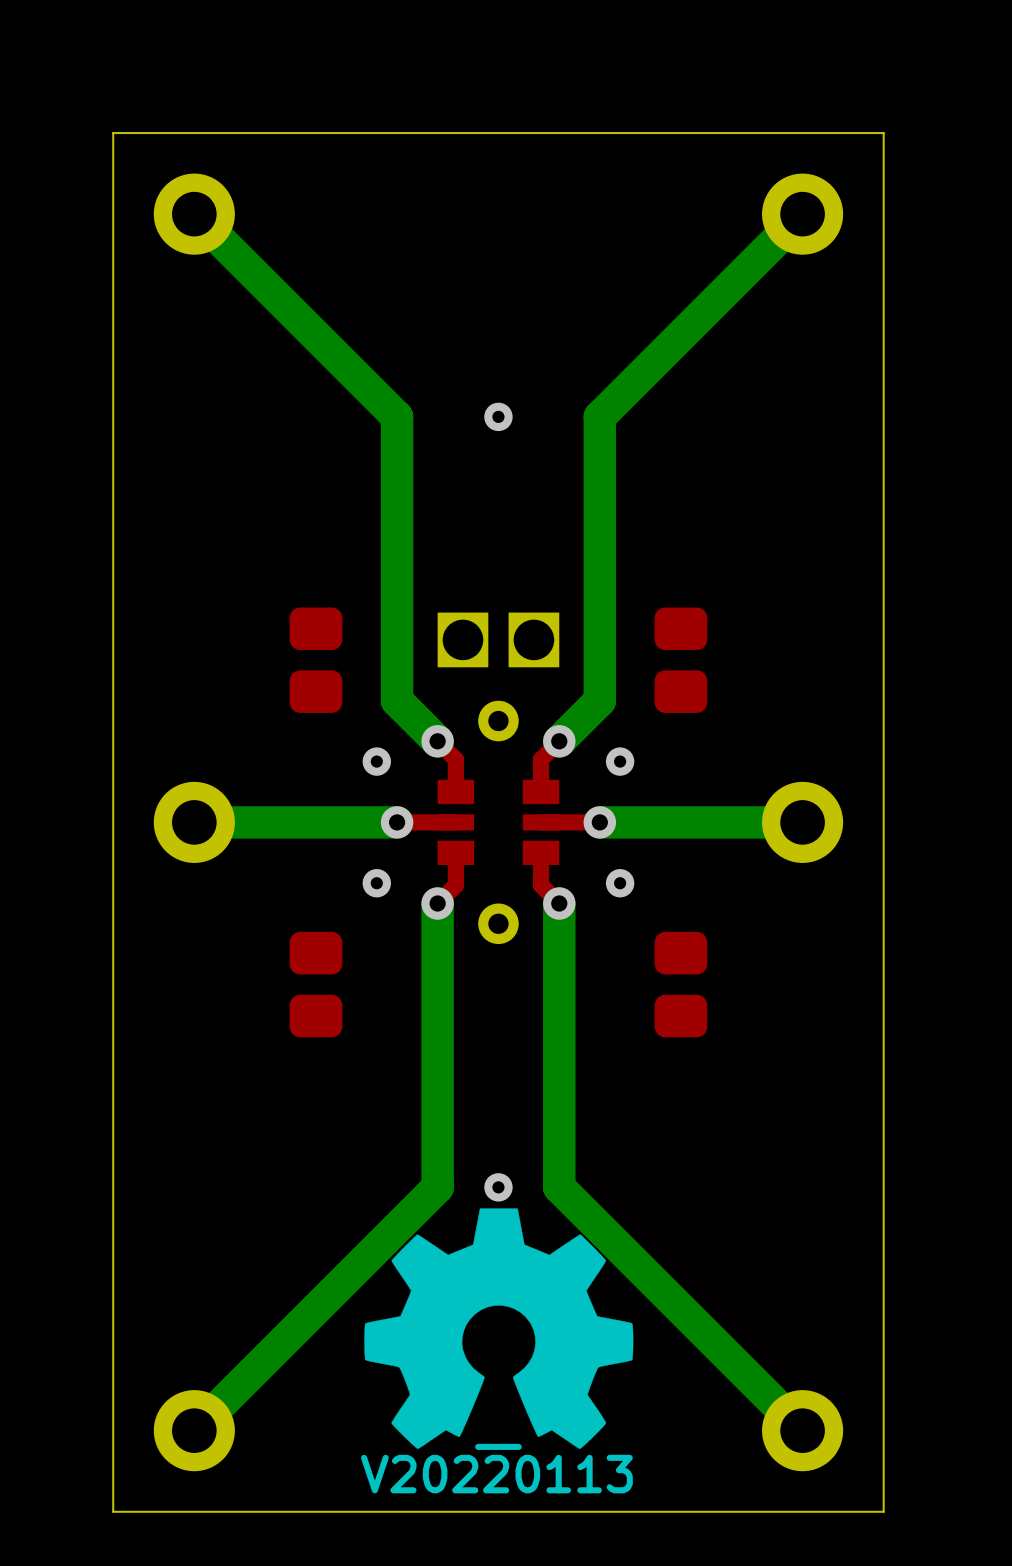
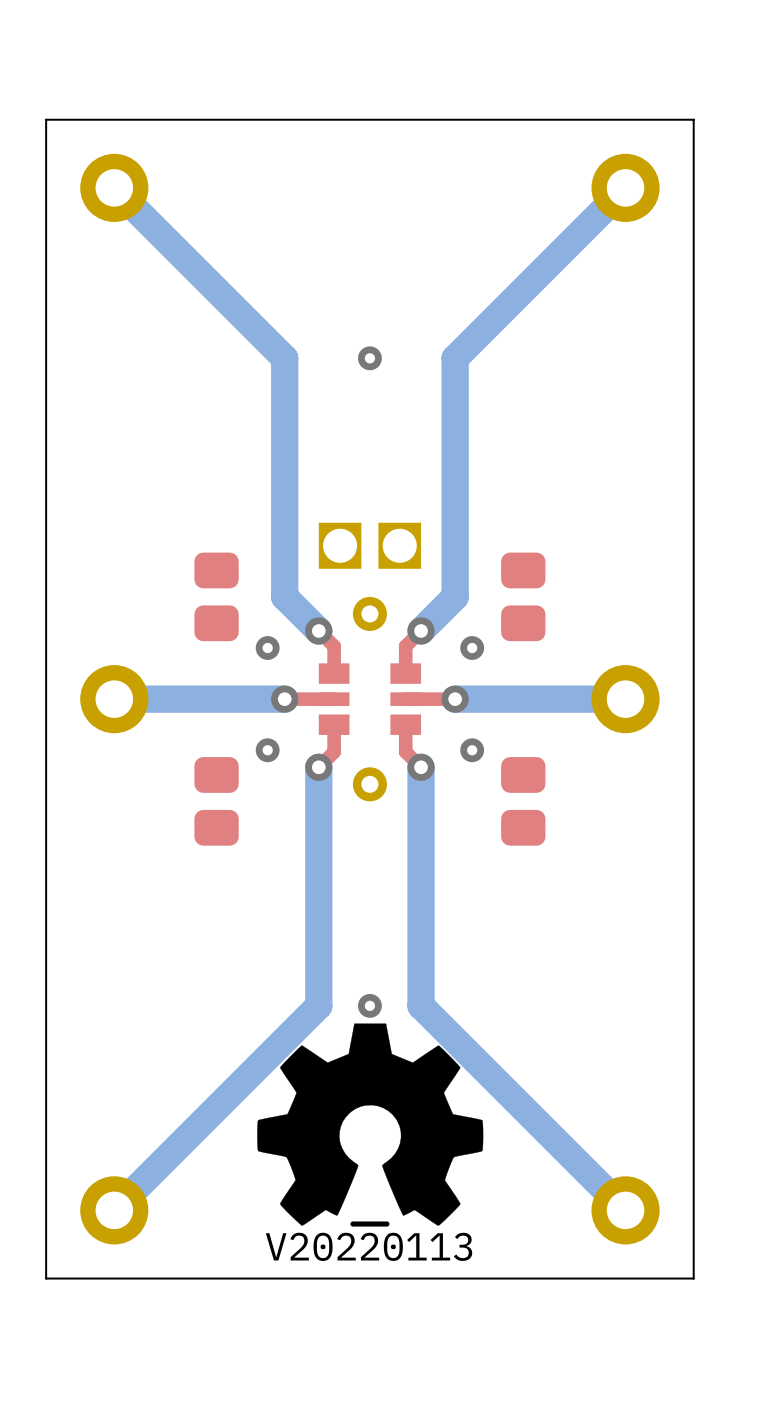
part position: (315, 660) -> (216, 596)
part position: (680, 660) -> (523, 596)
part position: (315, 984) -> (216, 801)
part position: (680, 984) -> (523, 801)

